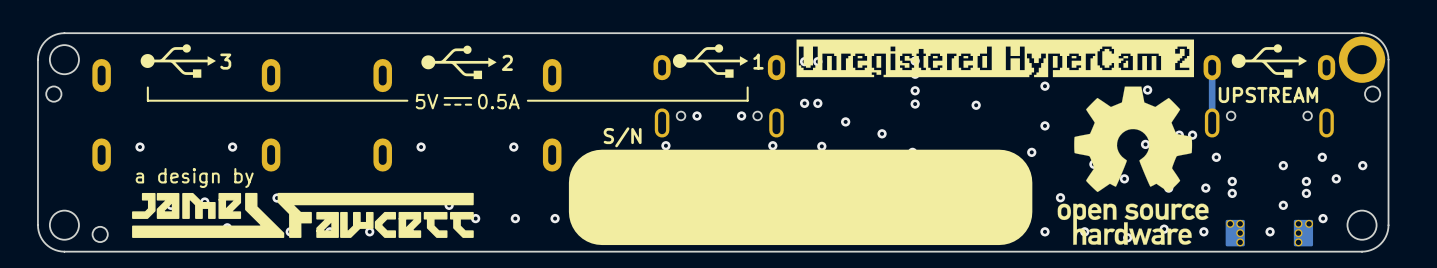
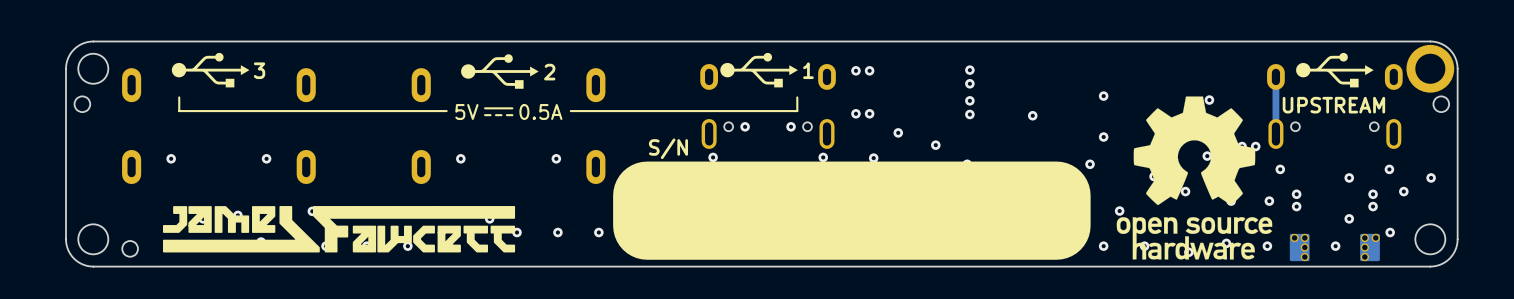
drawing: [796, 39, 1194, 78] -> none
text: a design by (194, 178) -> none

